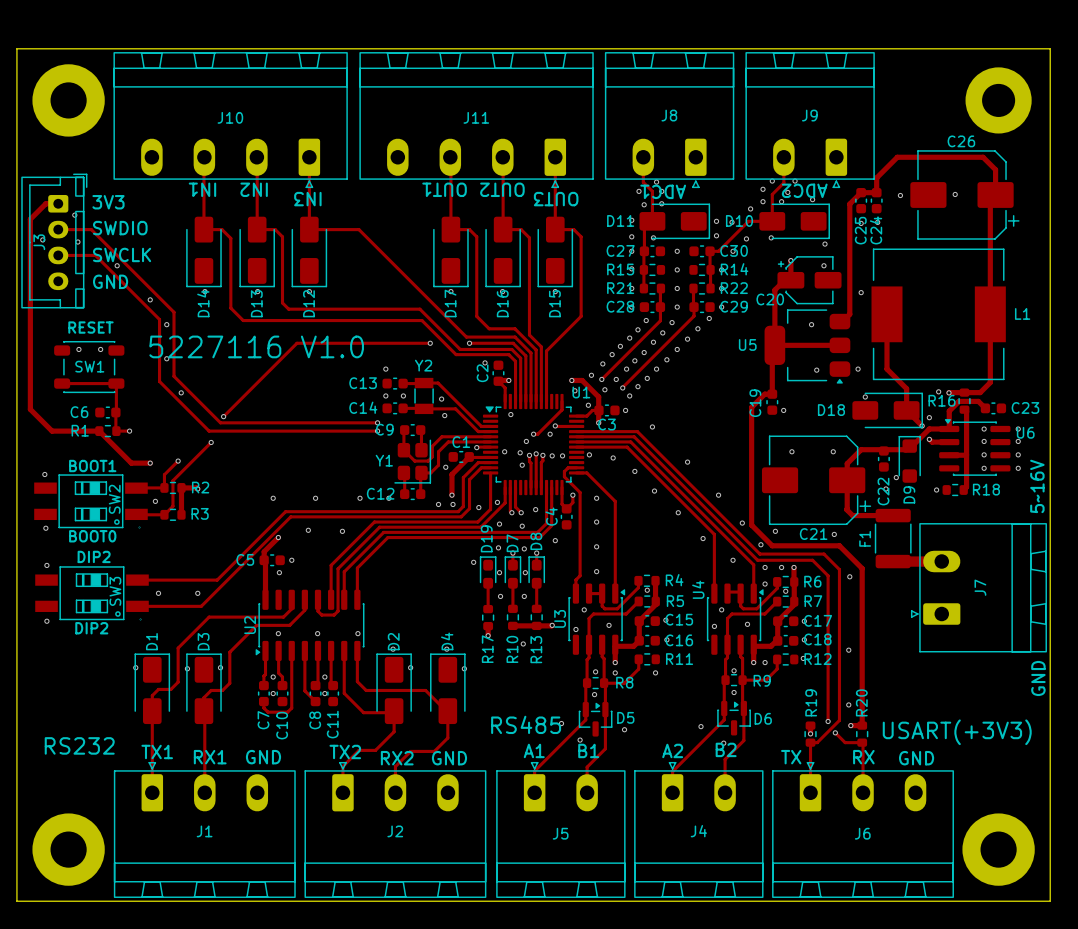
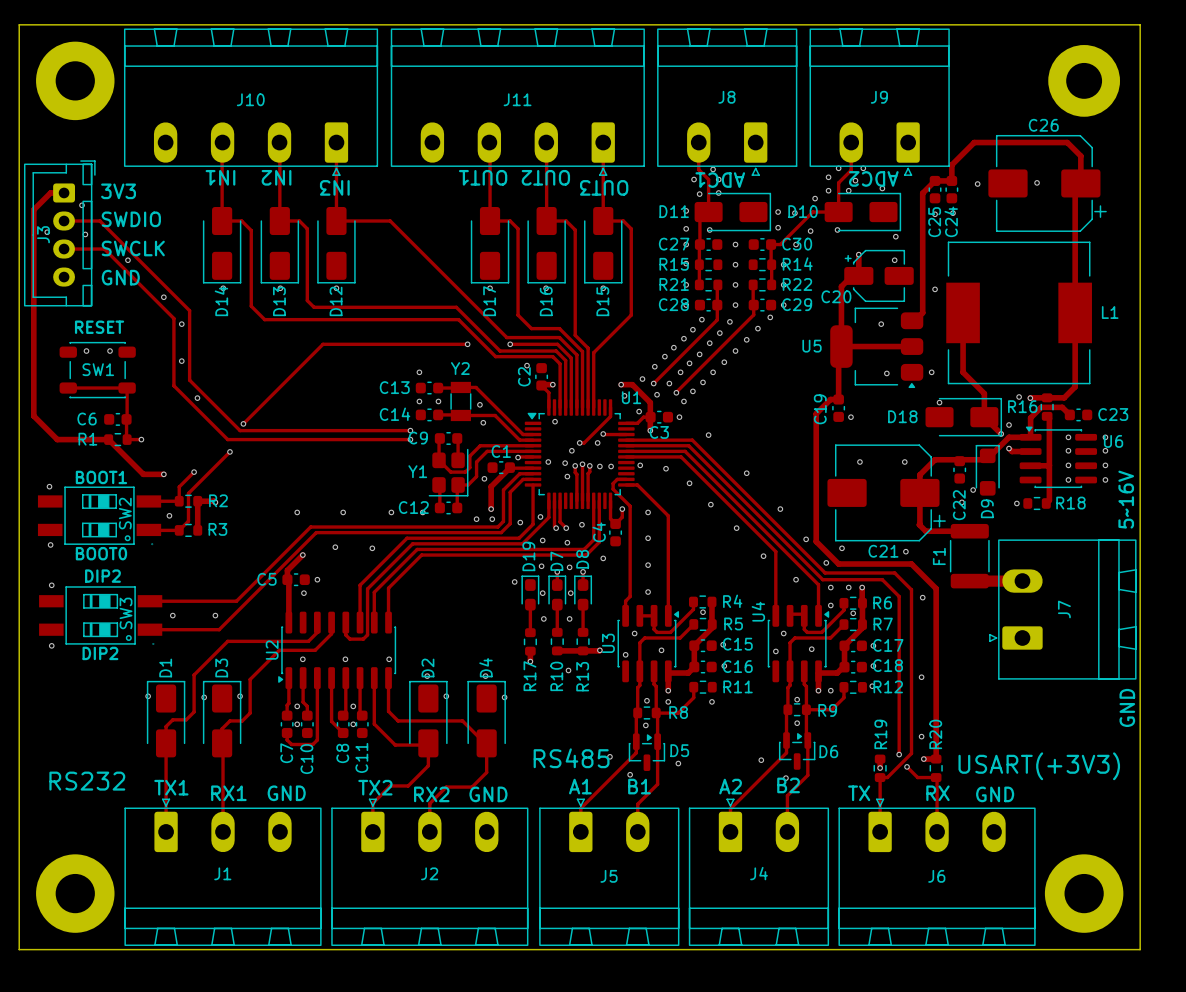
text: 5227116 V1.0 (256, 346) -> none

